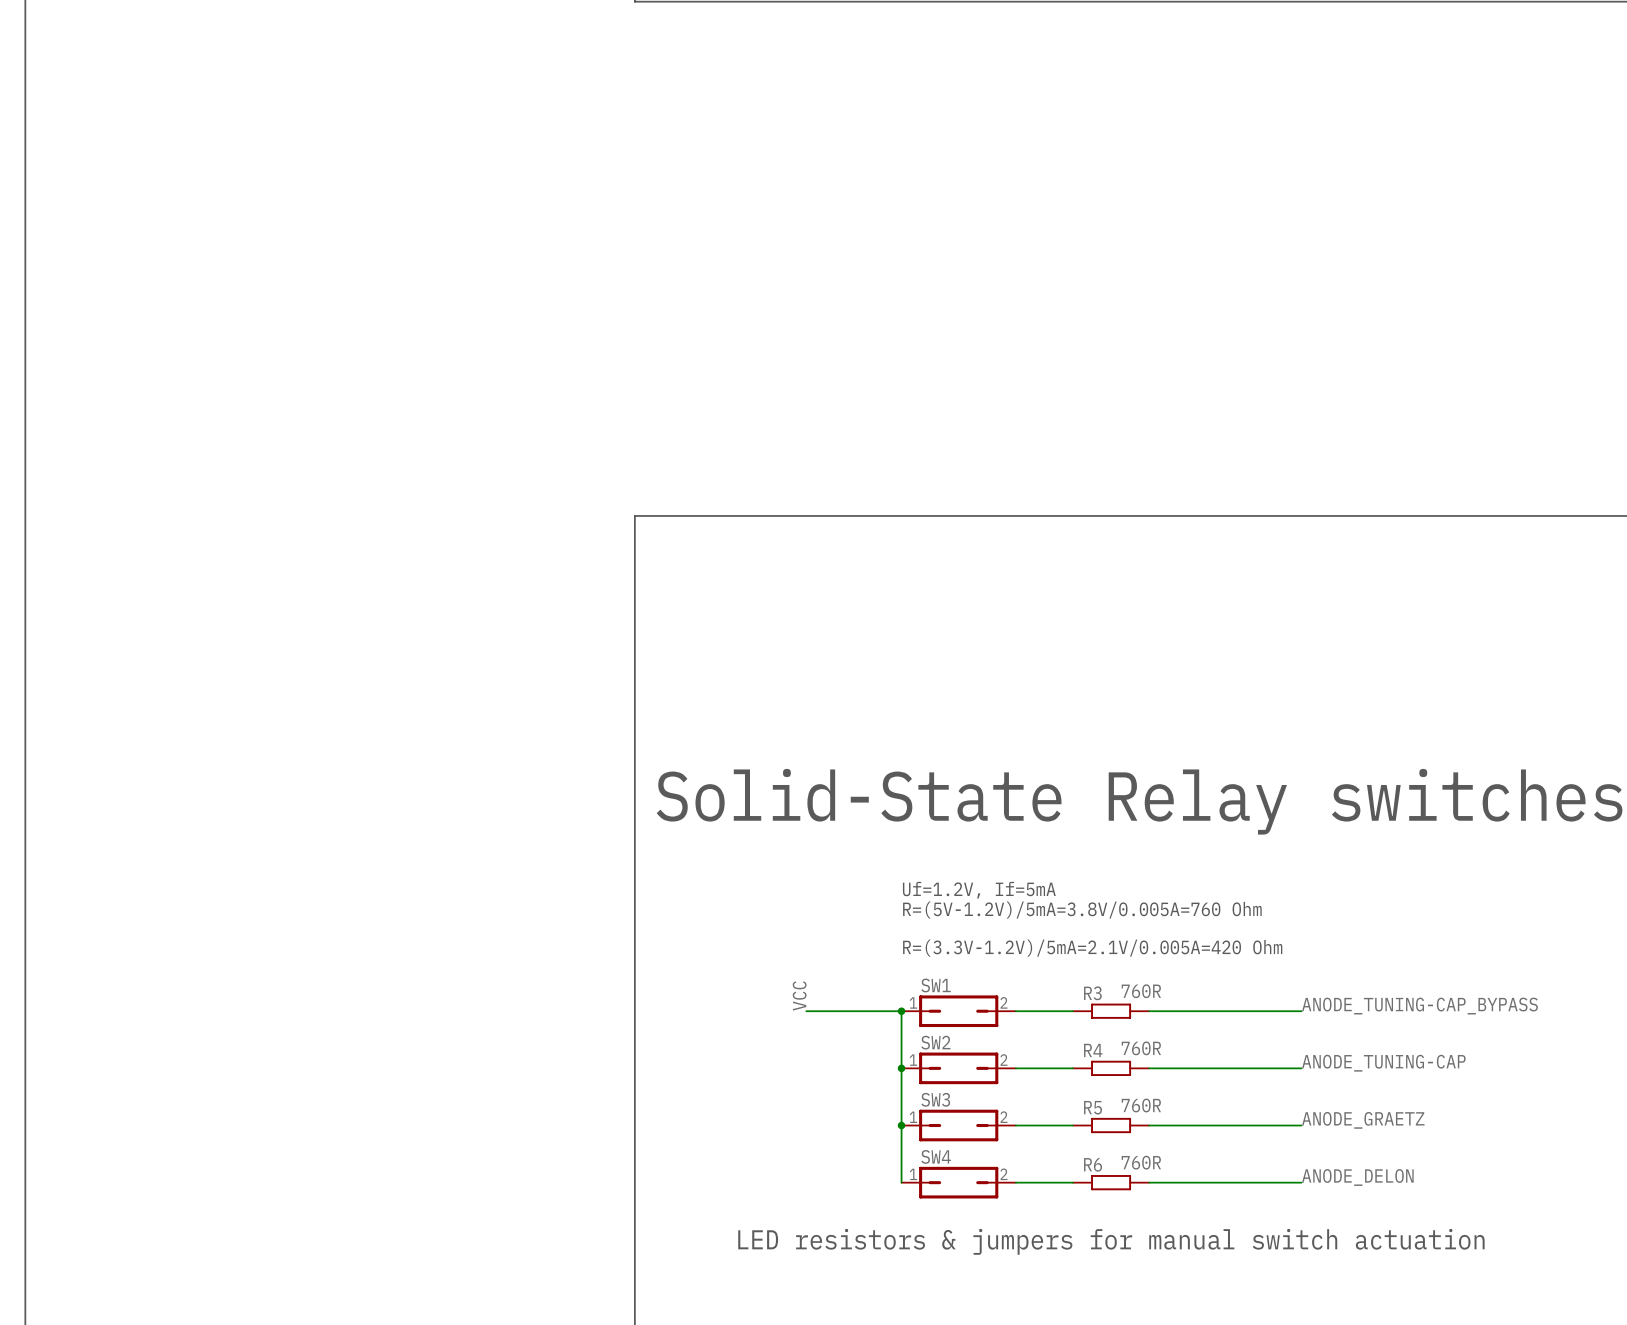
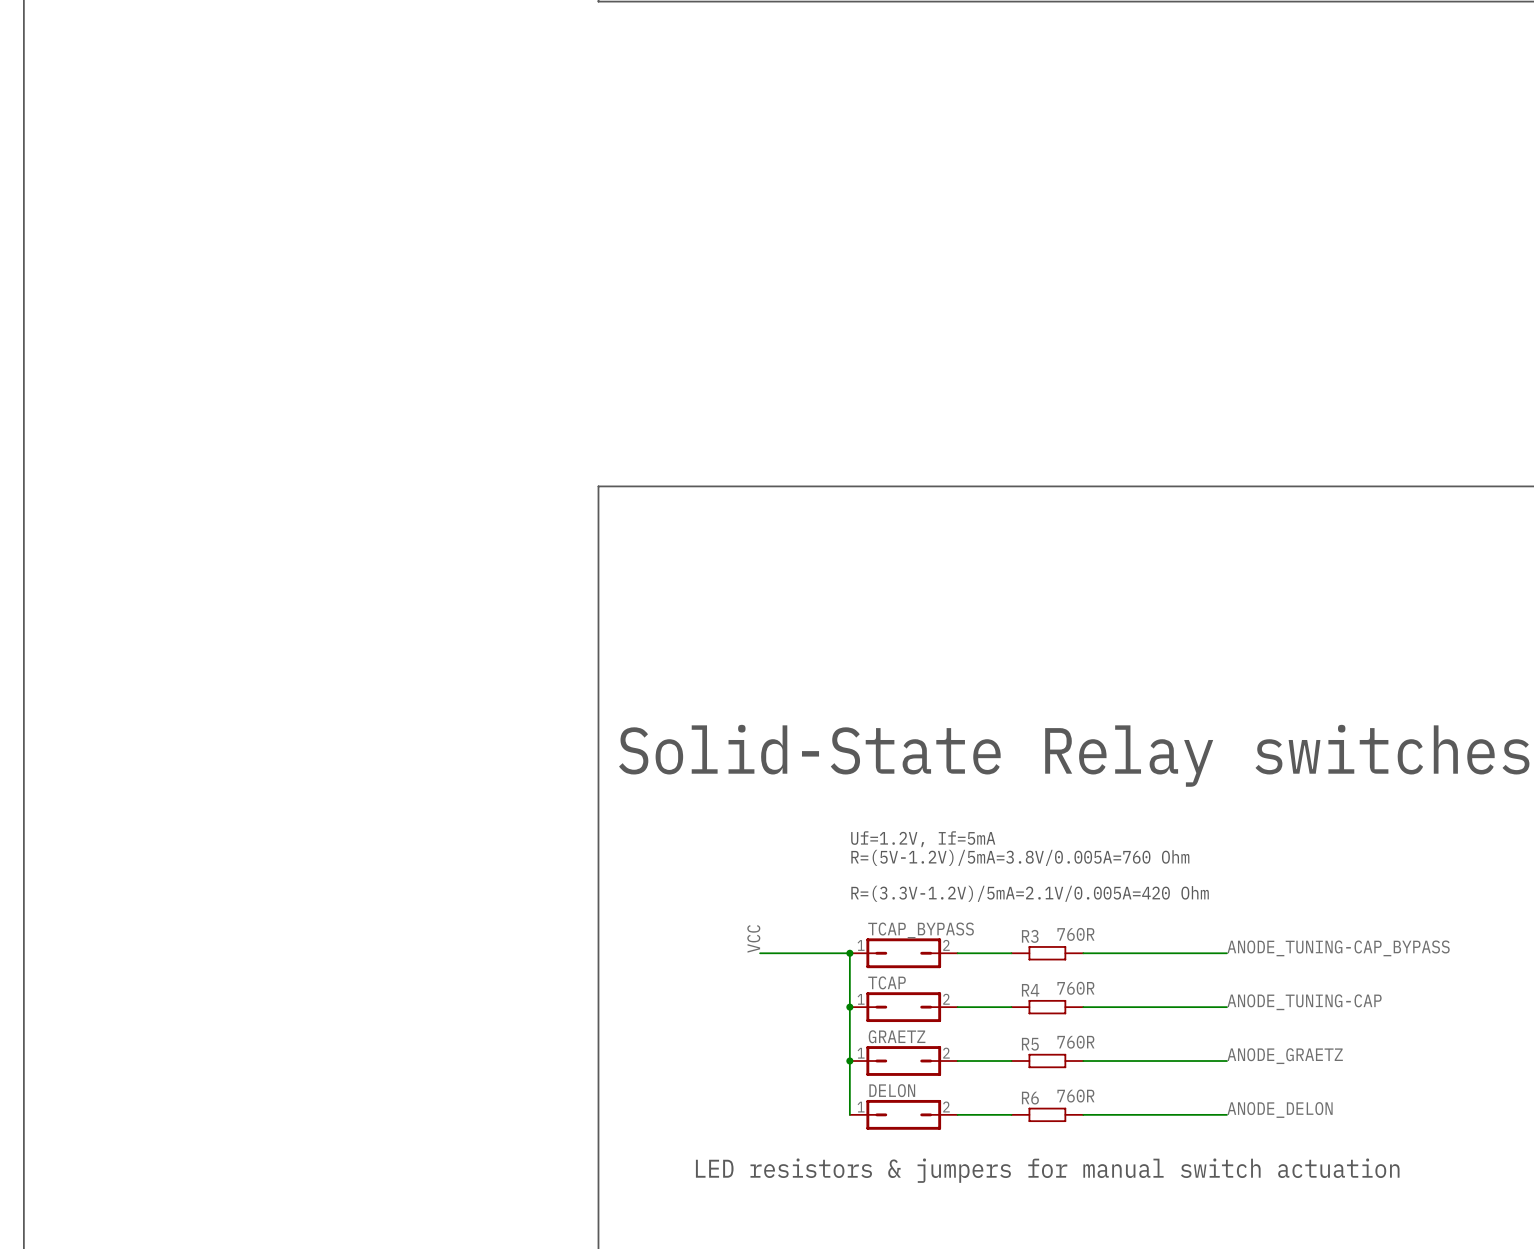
SW1 name: SW1 (936, 985) -> TCAP_BYPASS (921, 930)
SW2 name: SW2 (935, 1042) -> TCAP (887, 982)
SW3 name: SW3 (935, 1099) -> GRAETZ (897, 1036)
SW4 name: SW4 (936, 1156) -> DELON (892, 1090)

